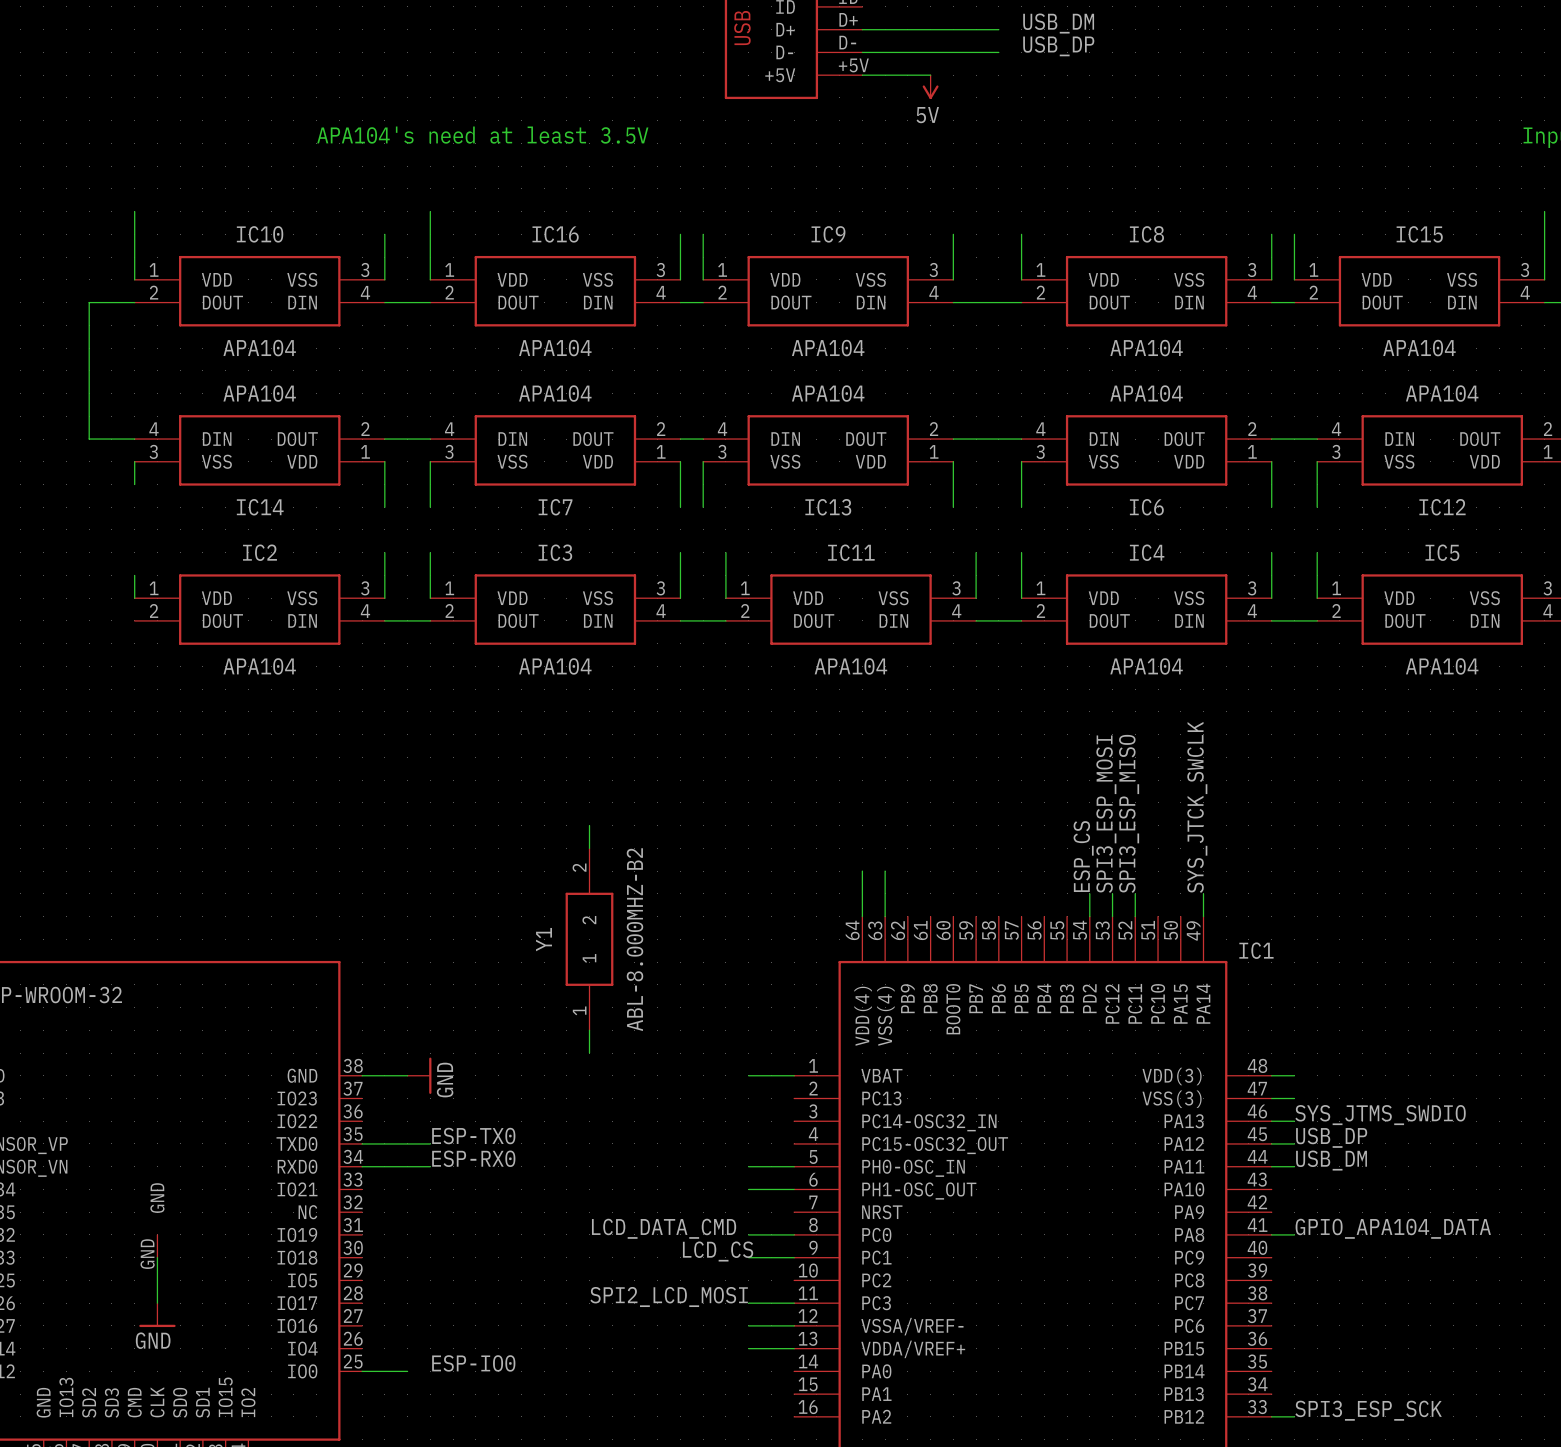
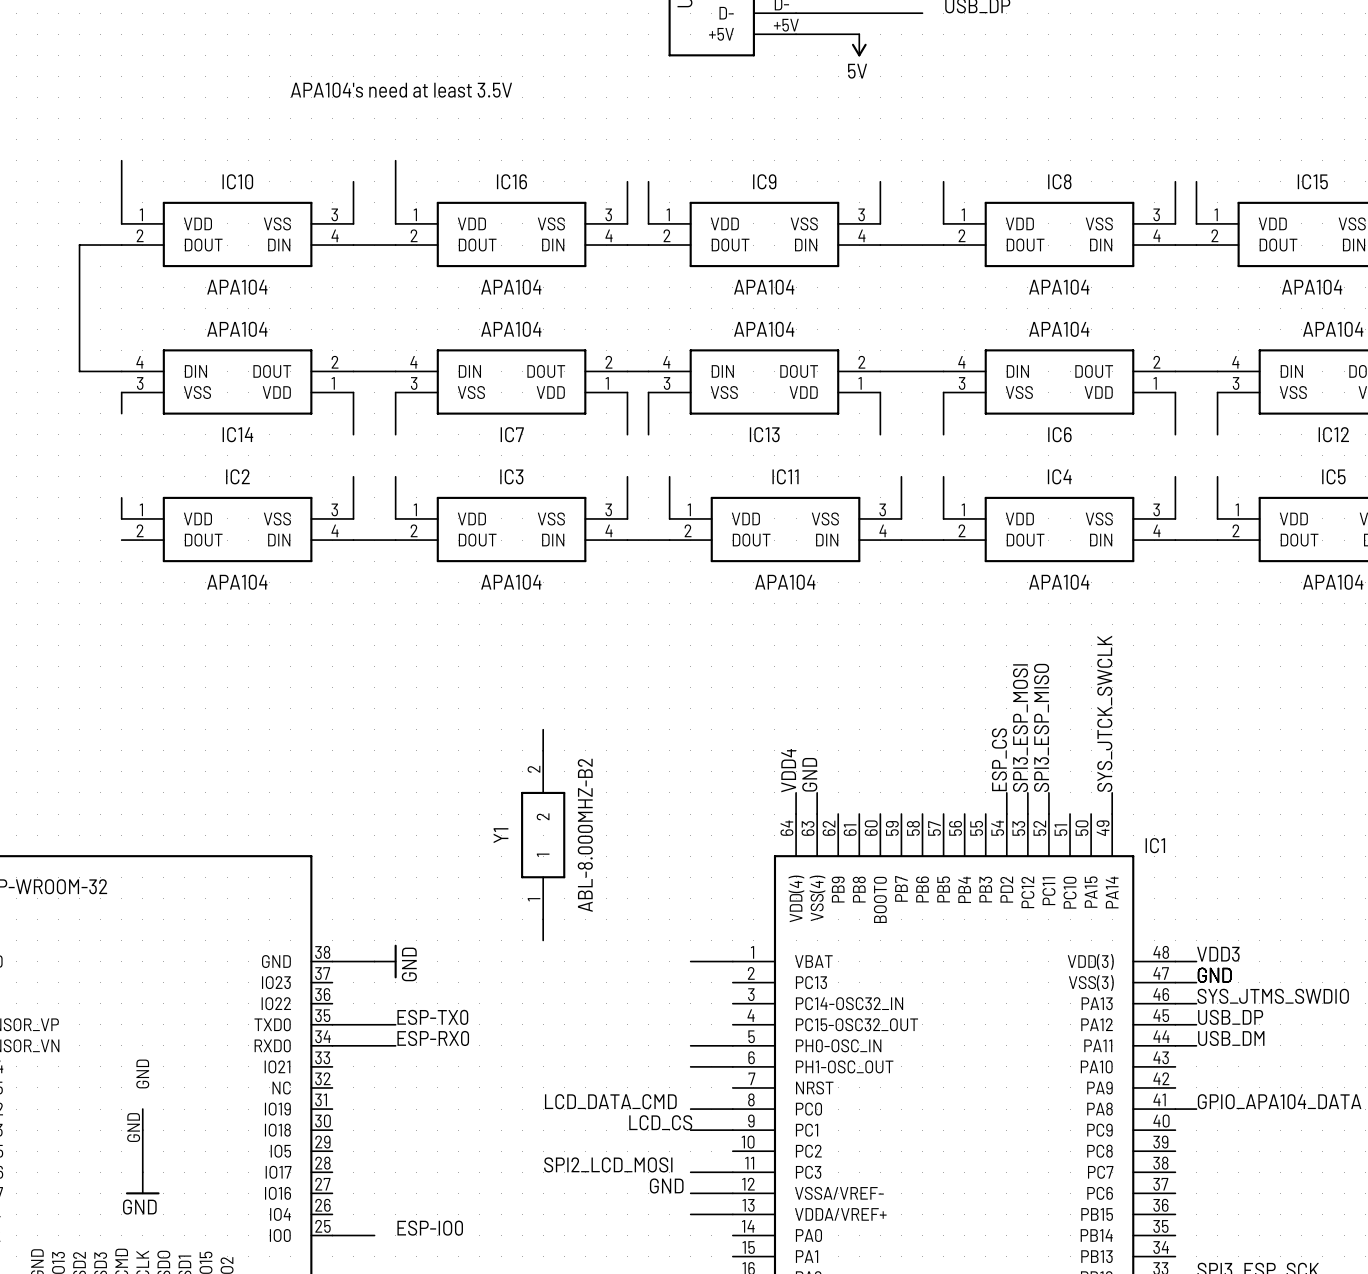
label: none -> VDD4 (788, 770)
wire: (862, 871) (862, 893) -> none
wire: (885, 871) (885, 893) -> none
label: none -> GND (809, 774)
label: none -> VDD3 (1218, 954)
label: none -> GND (1214, 975)
label: none -> GND (666, 1185)

